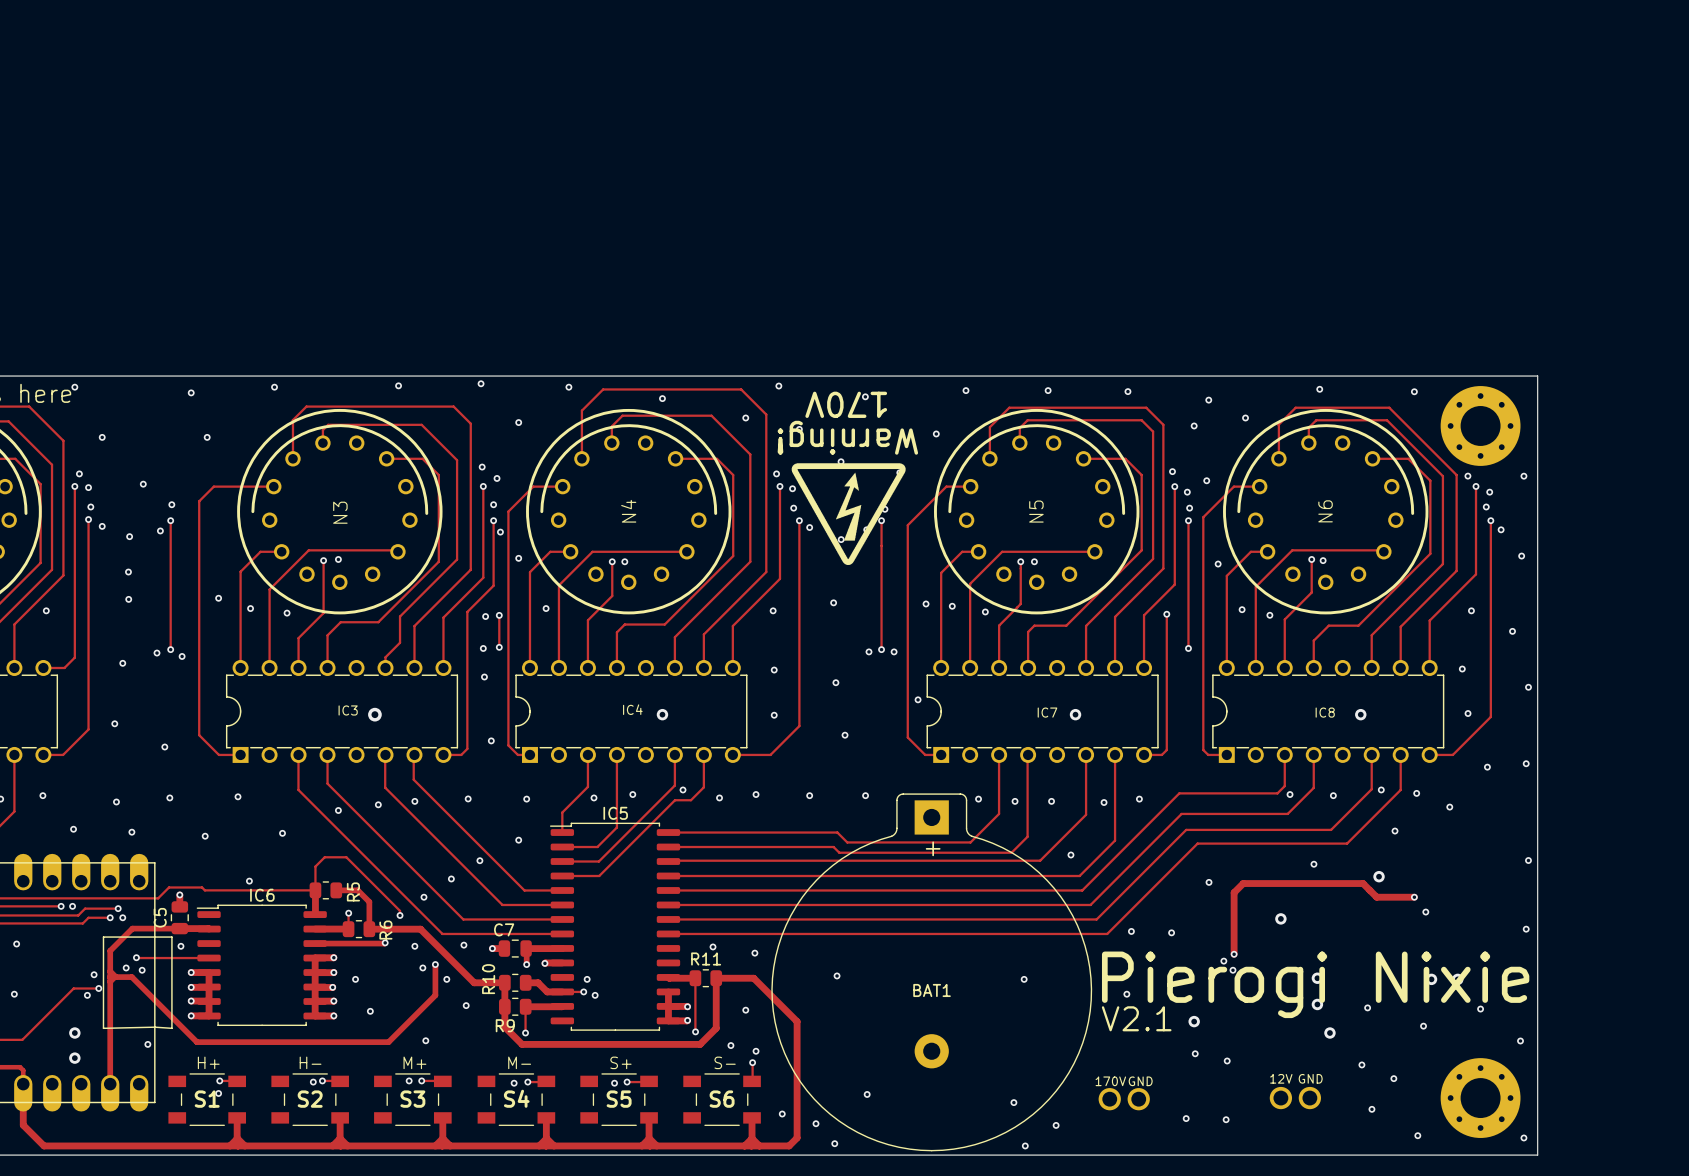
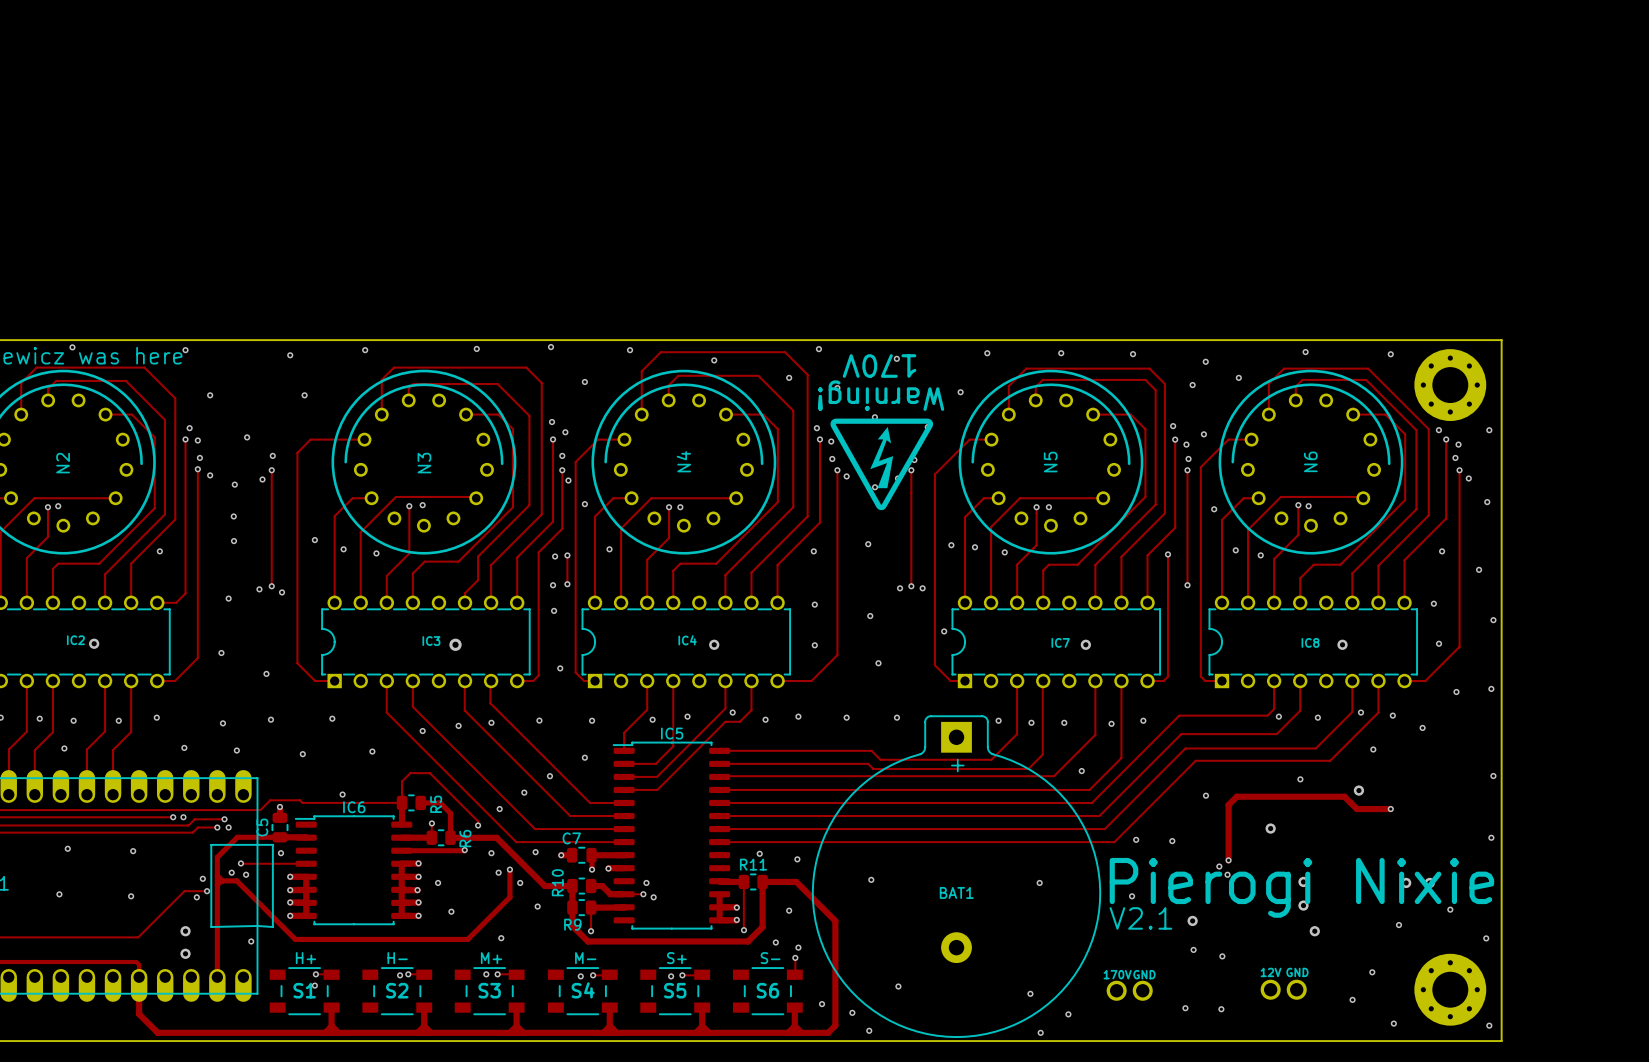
via: (1425, 912) -> none
via: (1367, 1007) -> none
via: (1361, 1064) -> none

